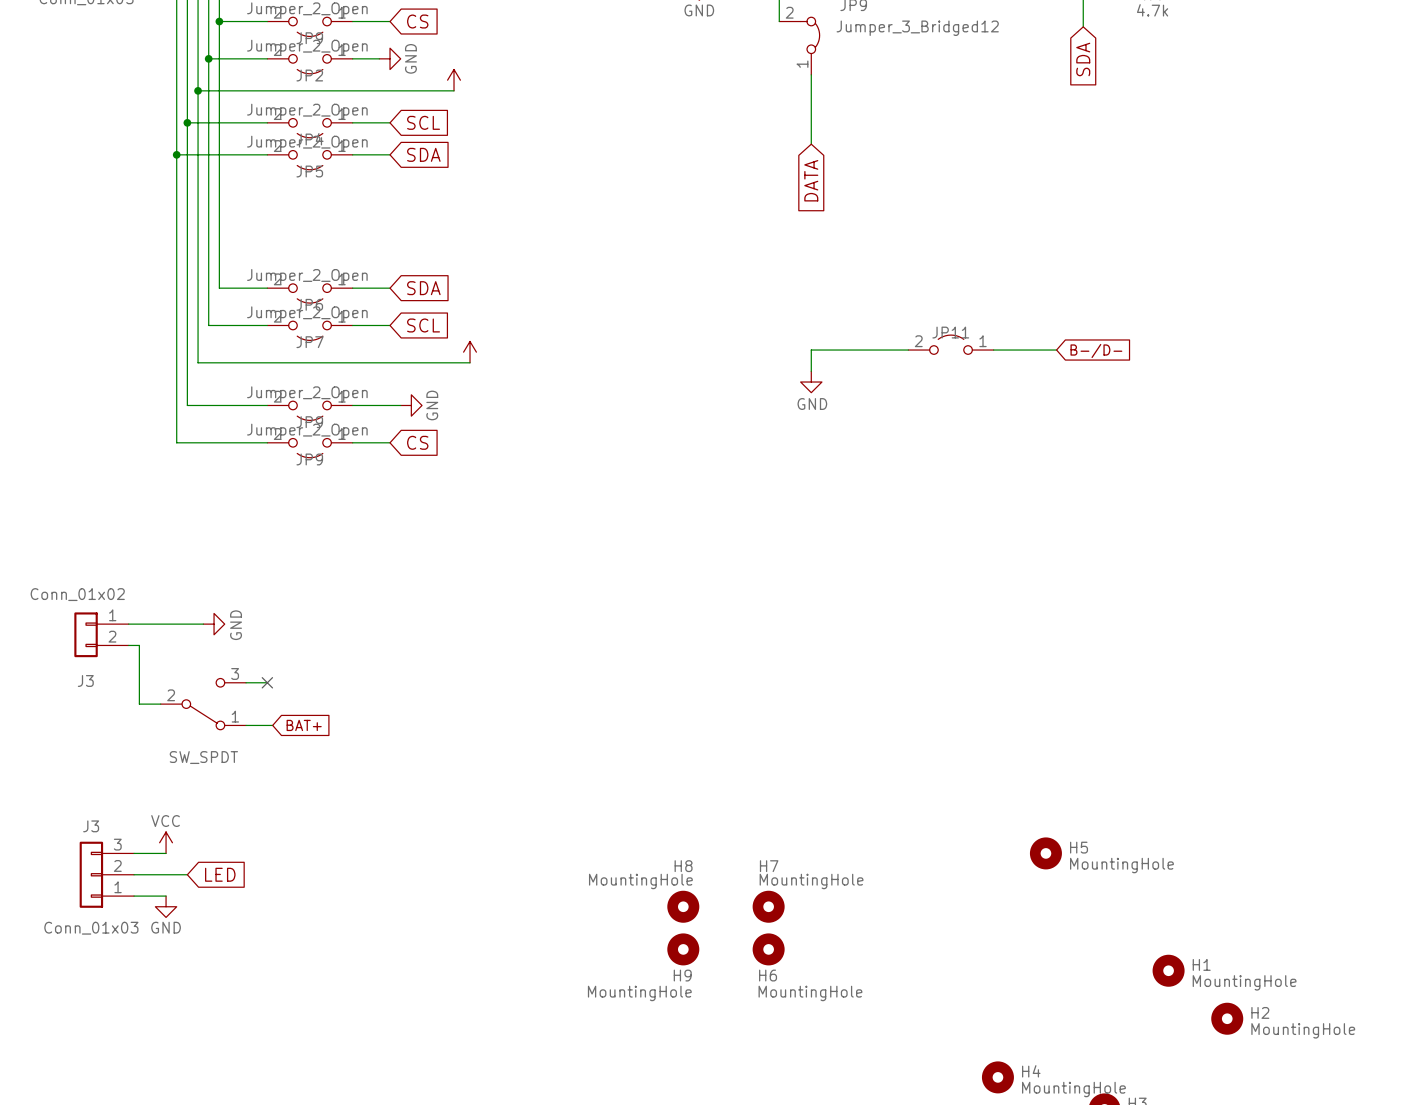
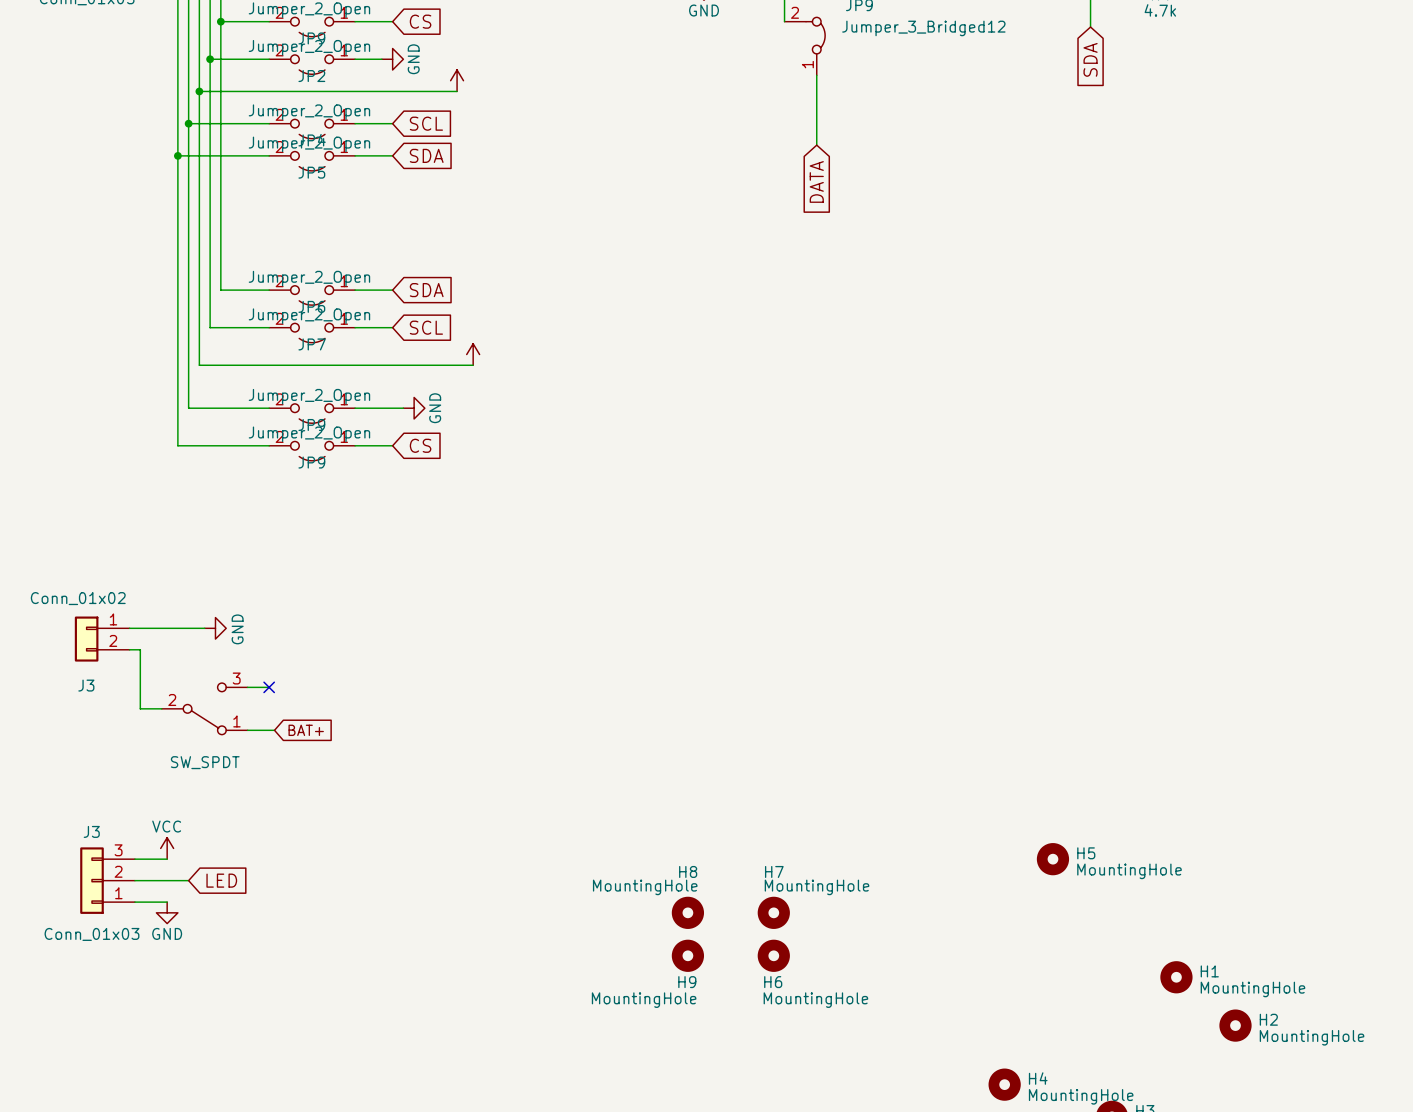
JP11: (951, 344) -> none
wire: (908, 350) (811, 350) (811, 371) -> none
wire: (993, 350) (1056, 350) -> none
global label: B-/D- (1096, 350) -> none
power symbol: GND (811, 382) -> none

